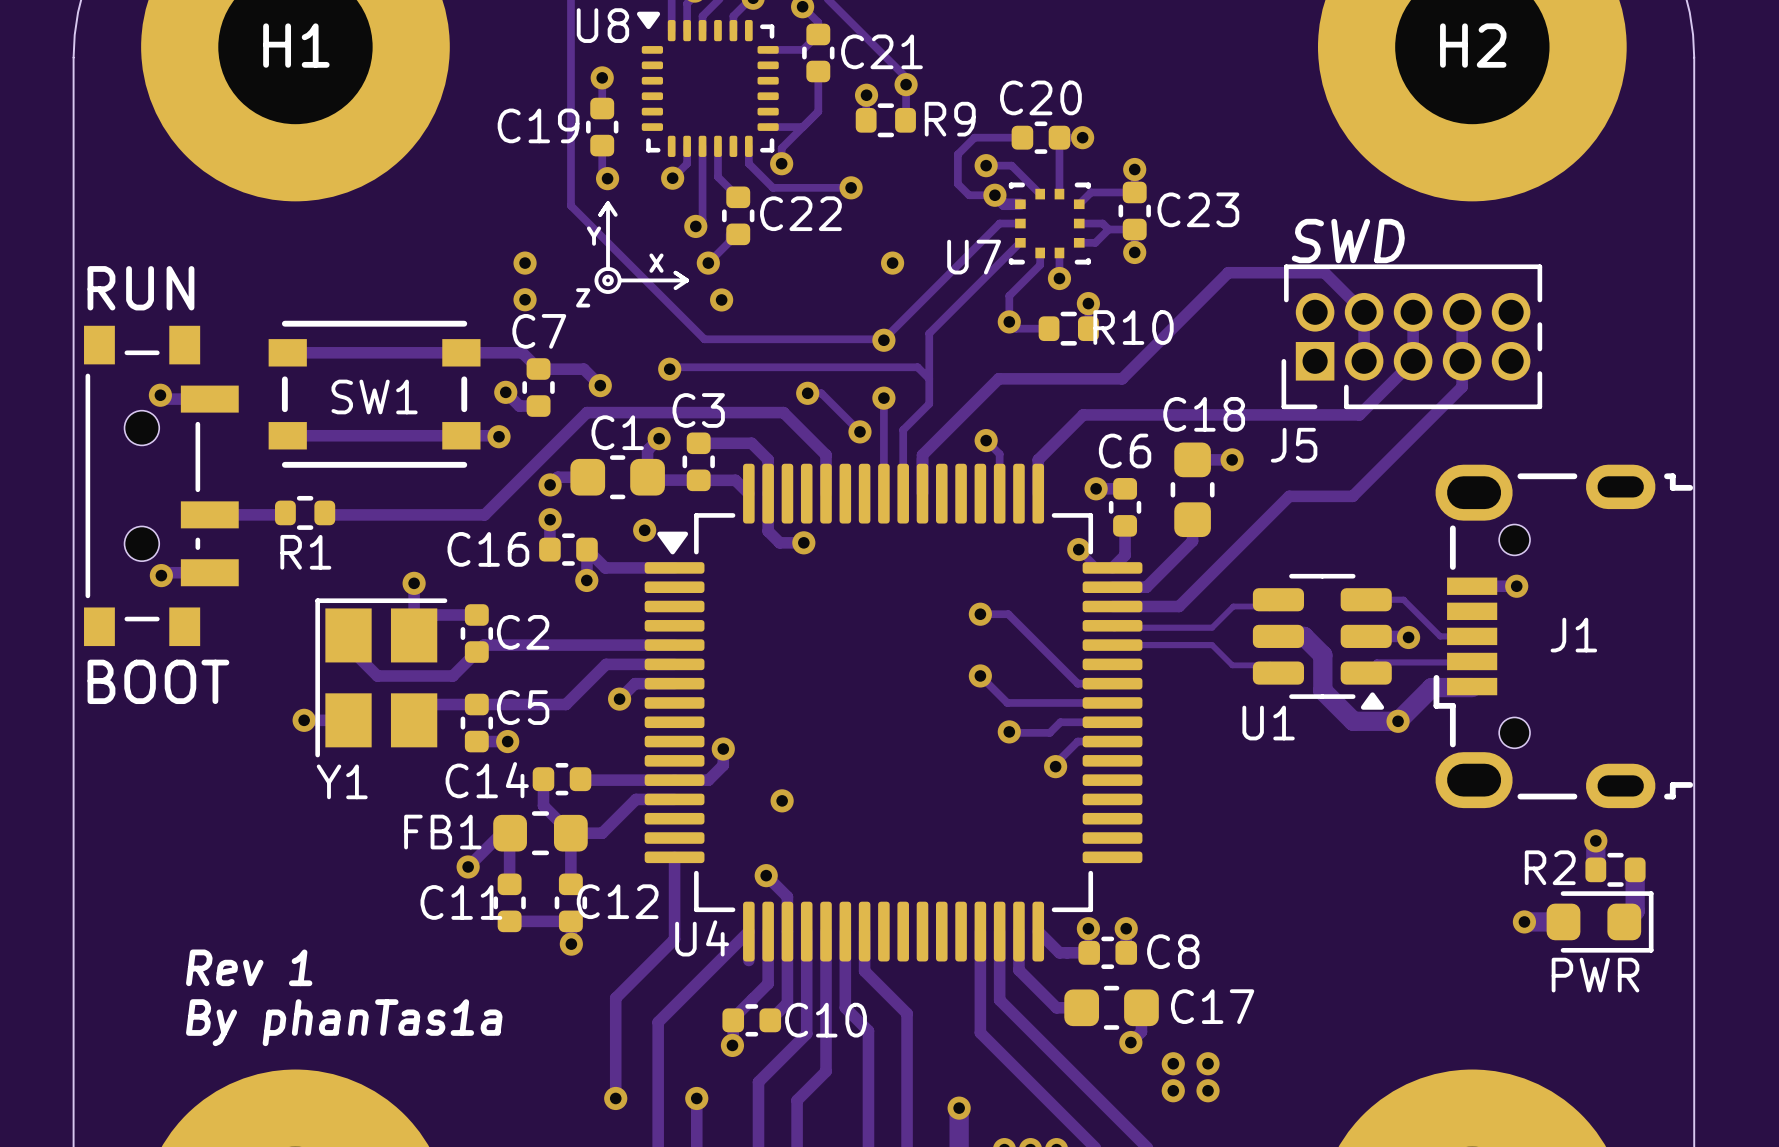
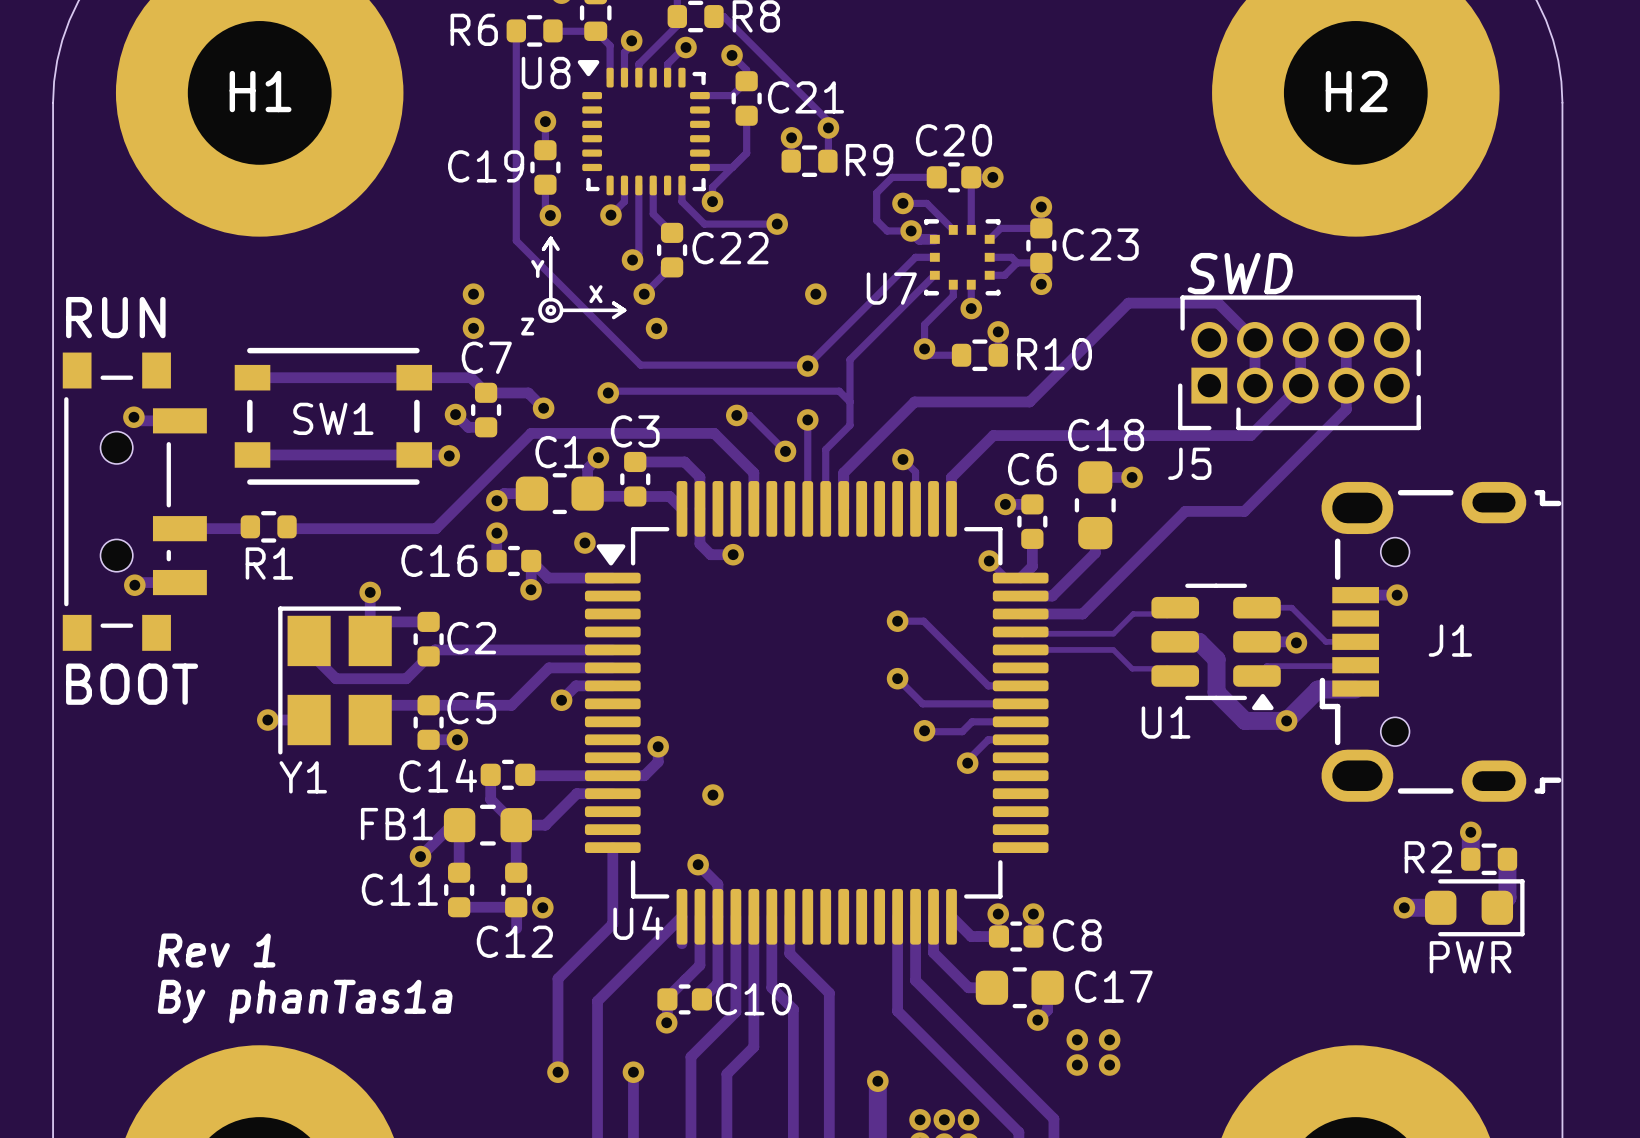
R10 name position: R10 (1133, 327) -> R10 (1054, 354)
C12 name position: C12 (617, 901) -> C12 (514, 941)
C11 name position: C11 (461, 902) -> C11 (399, 889)
via position: (571, 944) -> (542, 907)

